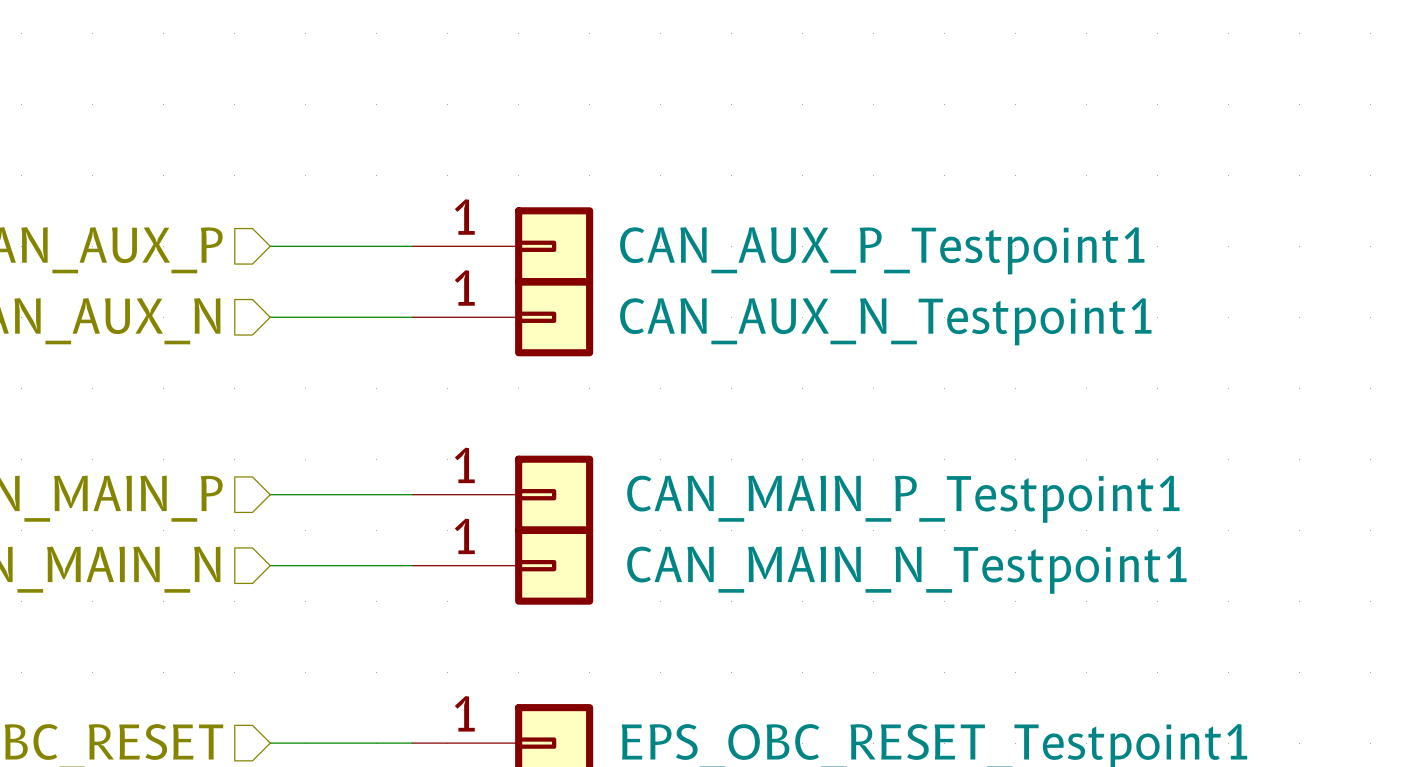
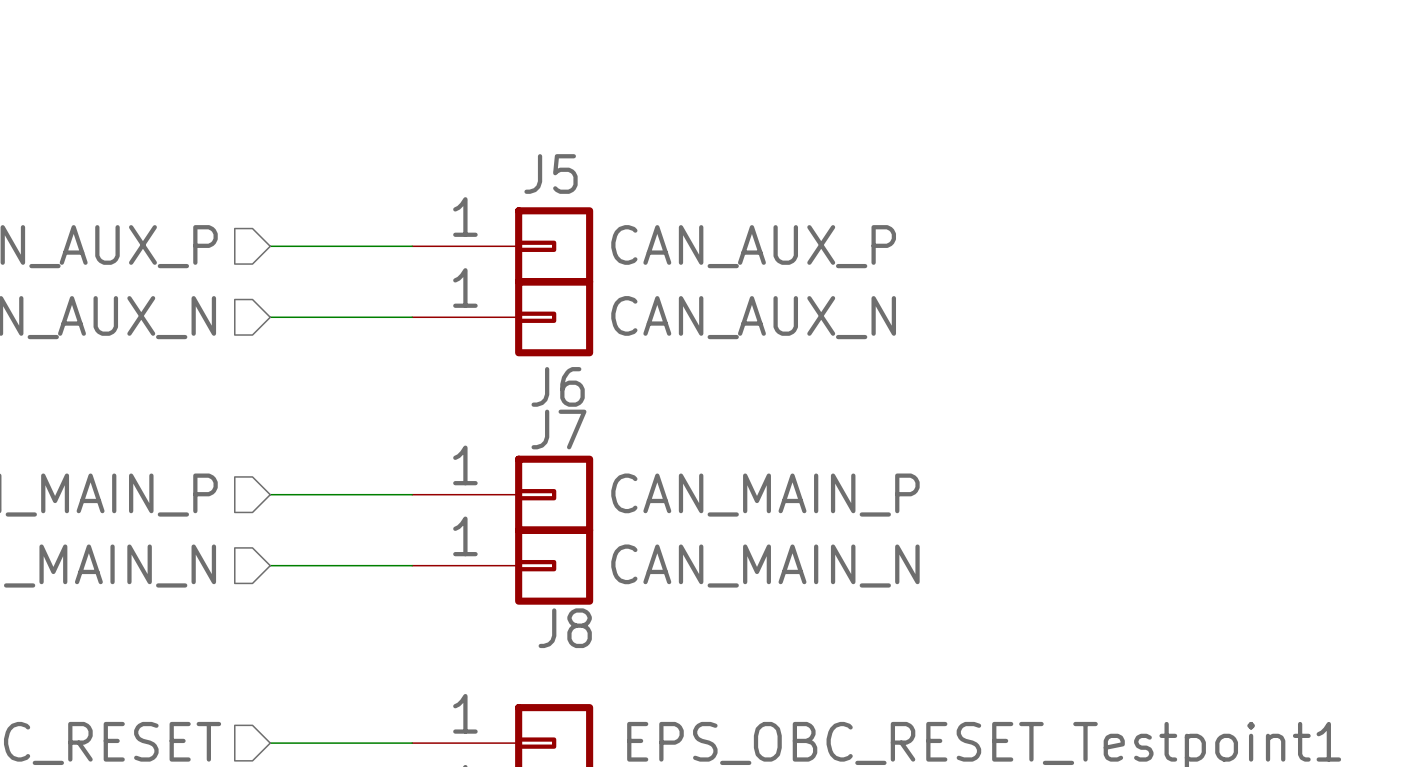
CAN_AUX_P_Testpoint1 value: none -> CAN_AUX_P (753, 246)
CAN_AUX_P_Testpoint1 name: CAN_AUX_P_Testpoint1 (882, 250) -> J5 (551, 174)
CAN_AUX_N_Testpoint1 value: none -> CAN_AUX_N (753, 317)
CAN_AUX_N_Testpoint1 name: CAN_AUX_N_Testpoint1 (885, 321) -> J6 (558, 386)
CAN_MAIN_P_Testpoint1 value: none -> CAN_MAIN_P (765, 495)
CAN_MAIN_P_Testpoint1 name: CAN_MAIN_P_Testpoint1 (903, 499) -> J7 (558, 429)
CAN_MAIN_N_Testpoint1 value: none -> CAN_MAIN_N (765, 566)
CAN_MAIN_N_Testpoint1 name: CAN_MAIN_N_Testpoint1 (906, 570) -> J8 (565, 628)

